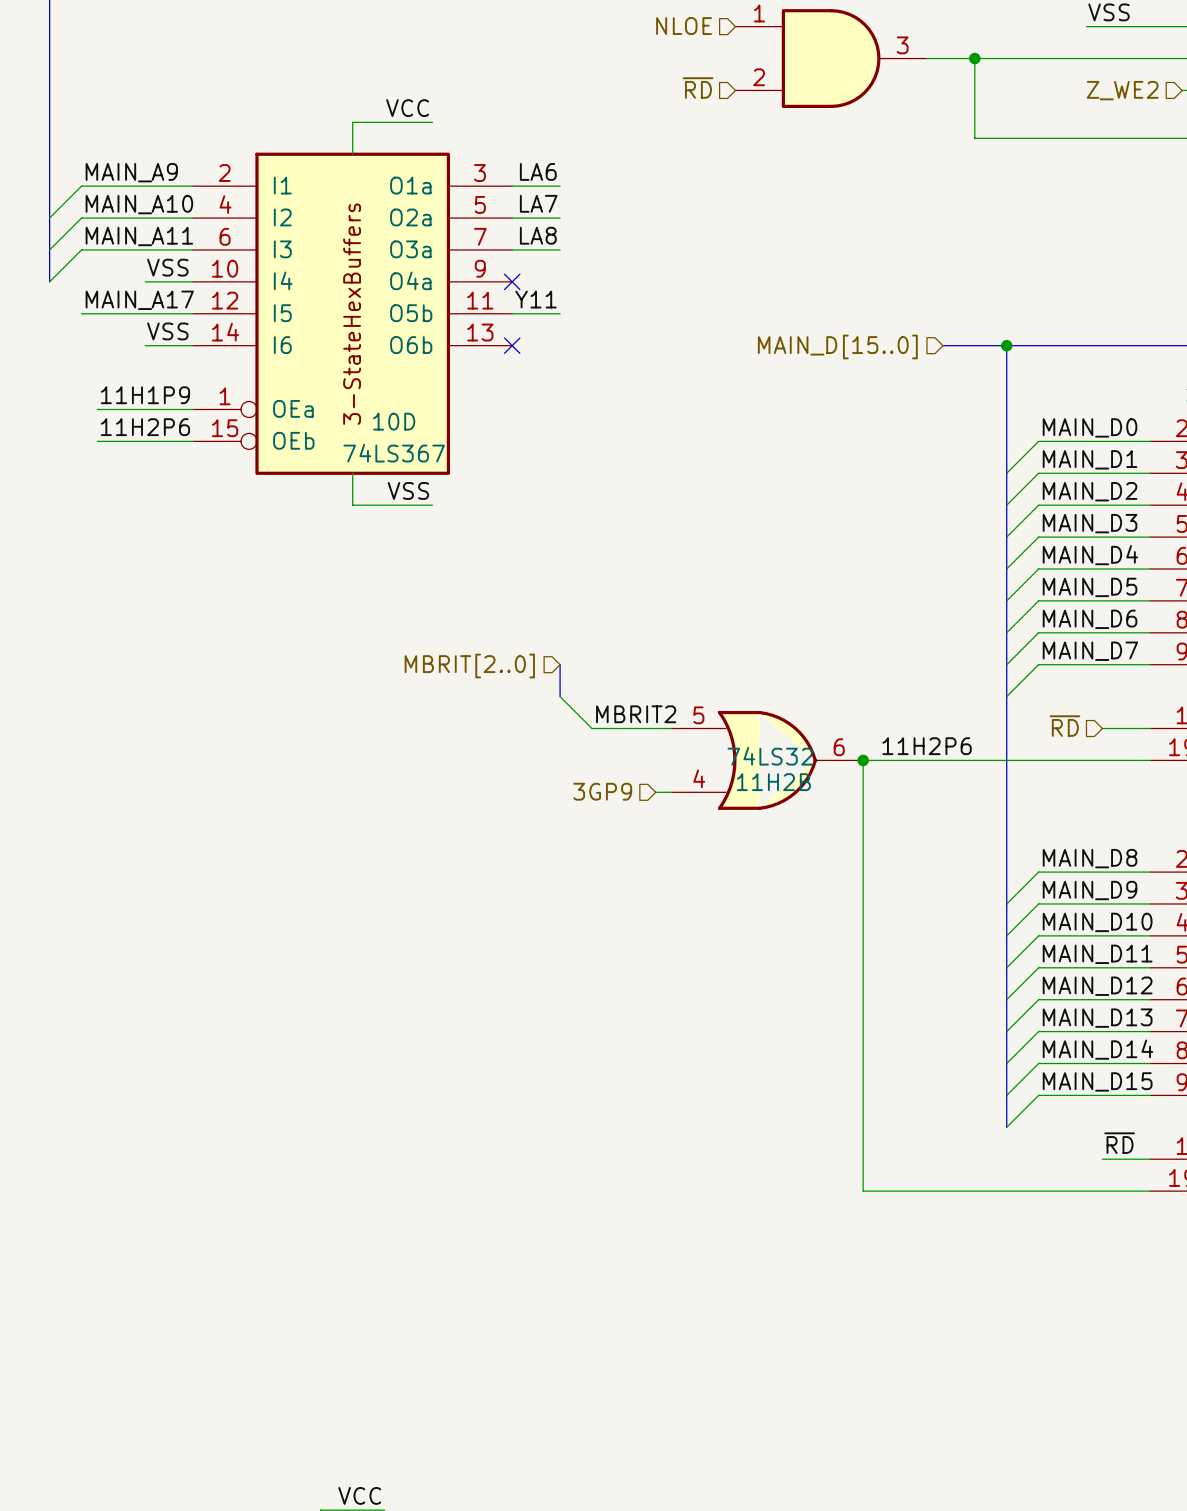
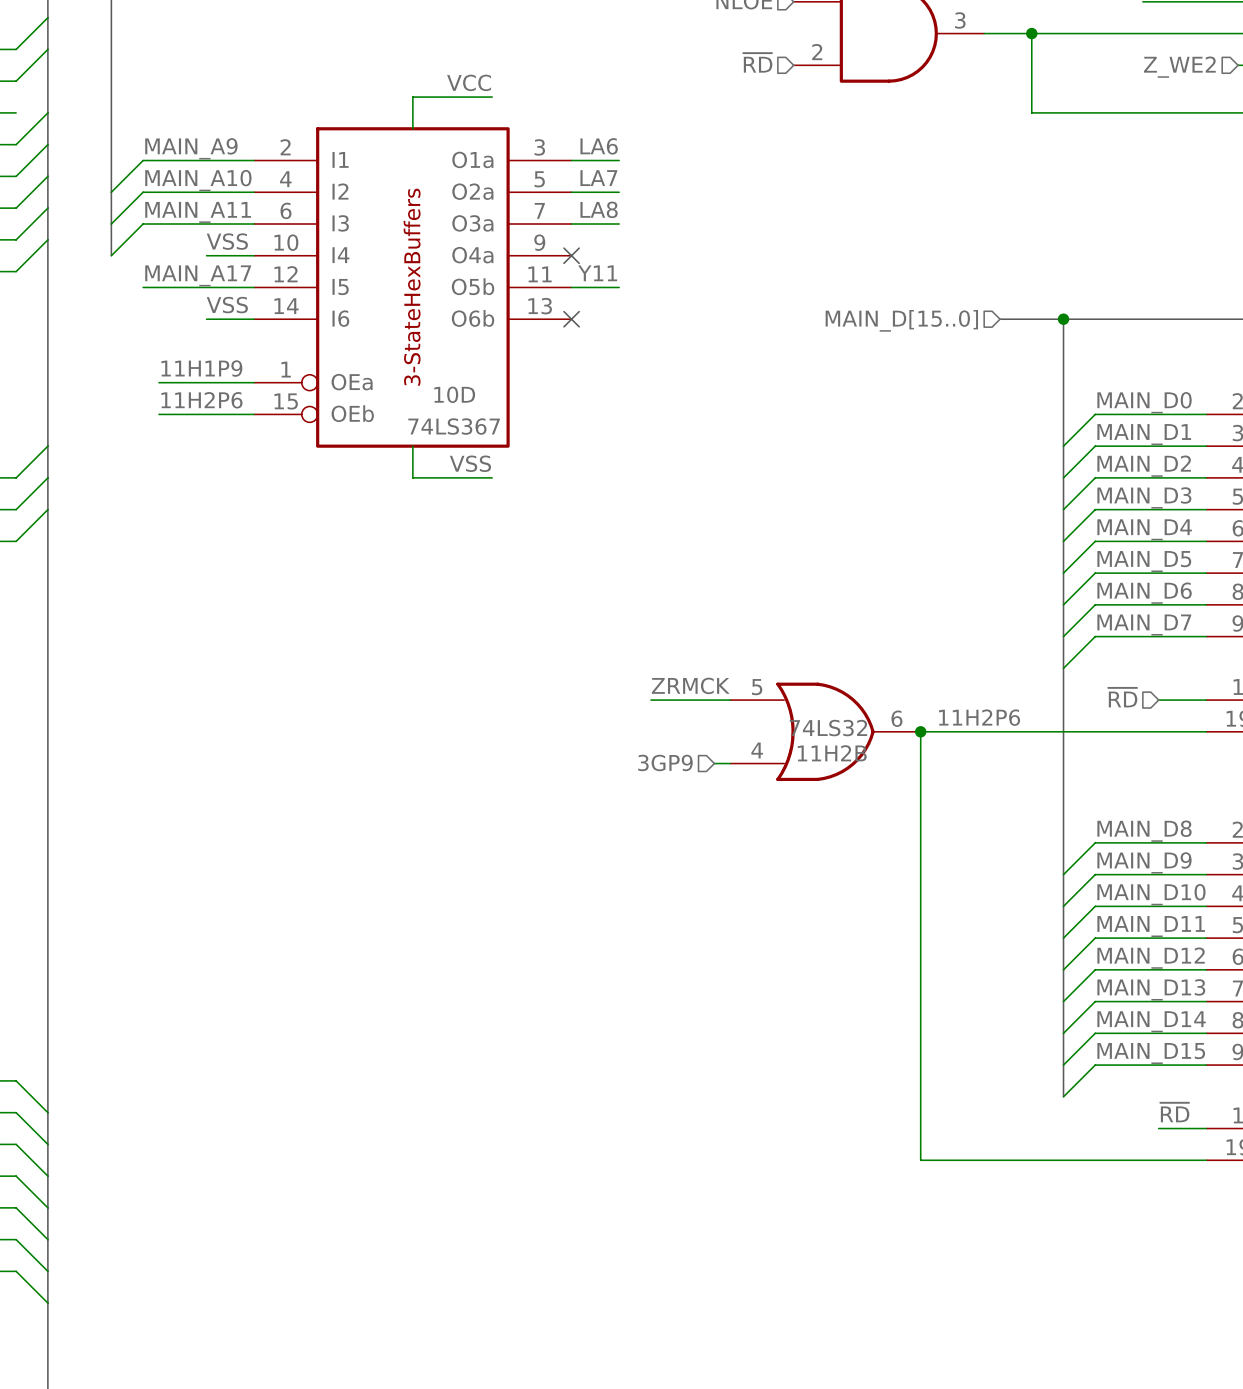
bus: (560, 664) (560, 696) -> none
hierarchical label: MBRIT[2..0] (469, 666) -> none
wire: (560, 696) (591, 728) -> none
label: MBRIT2 (636, 714) -> ZRMCK (690, 685)

